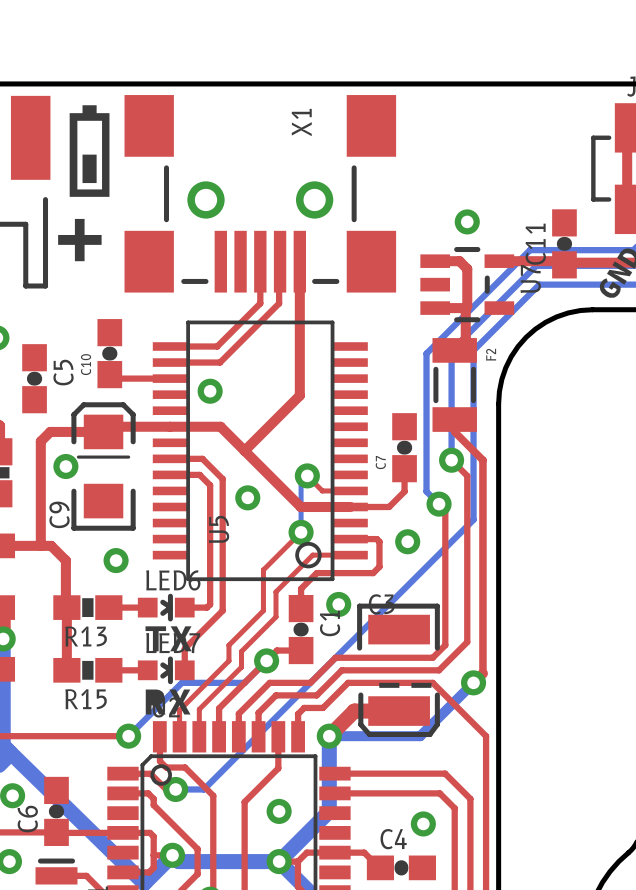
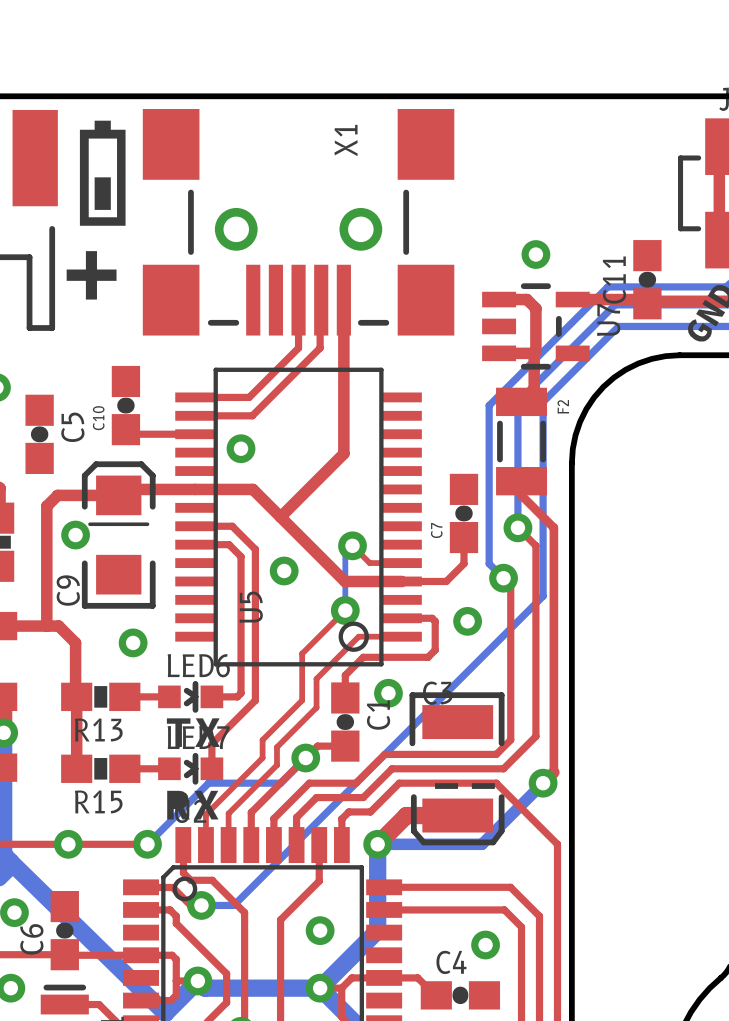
via: none -> (68, 844)

